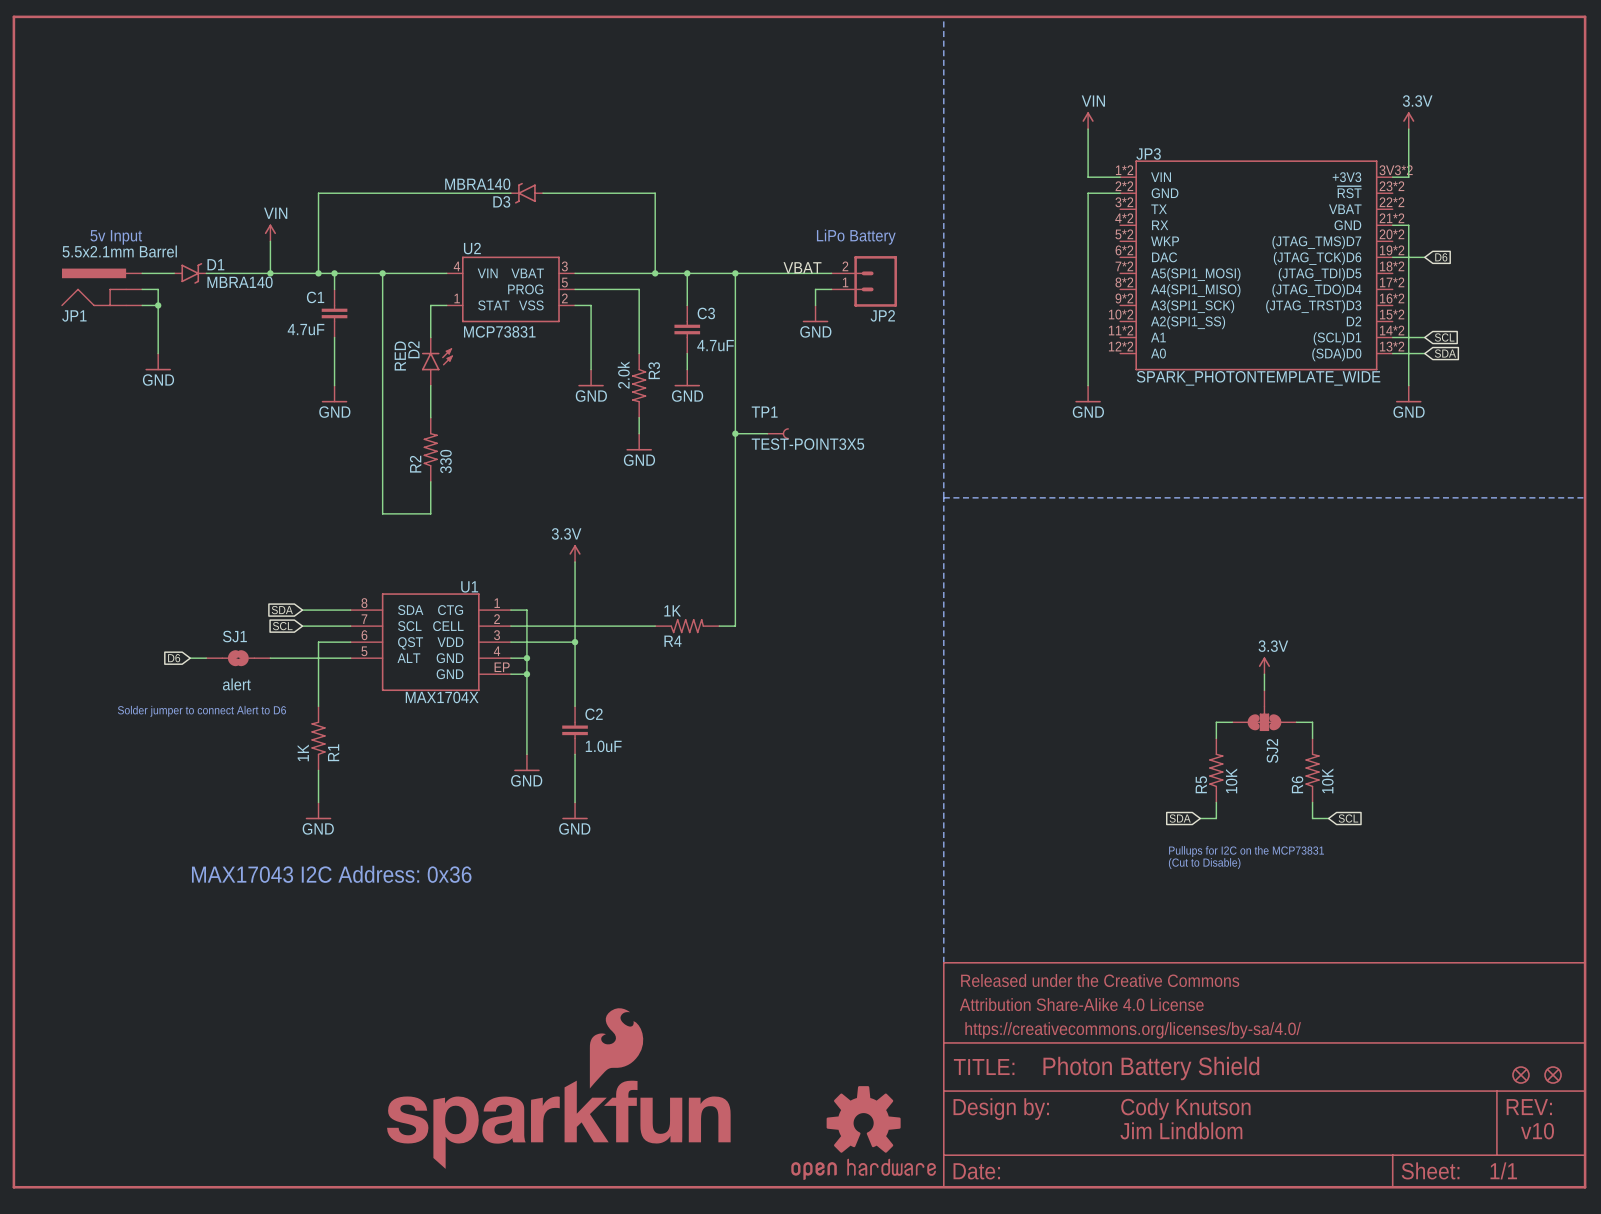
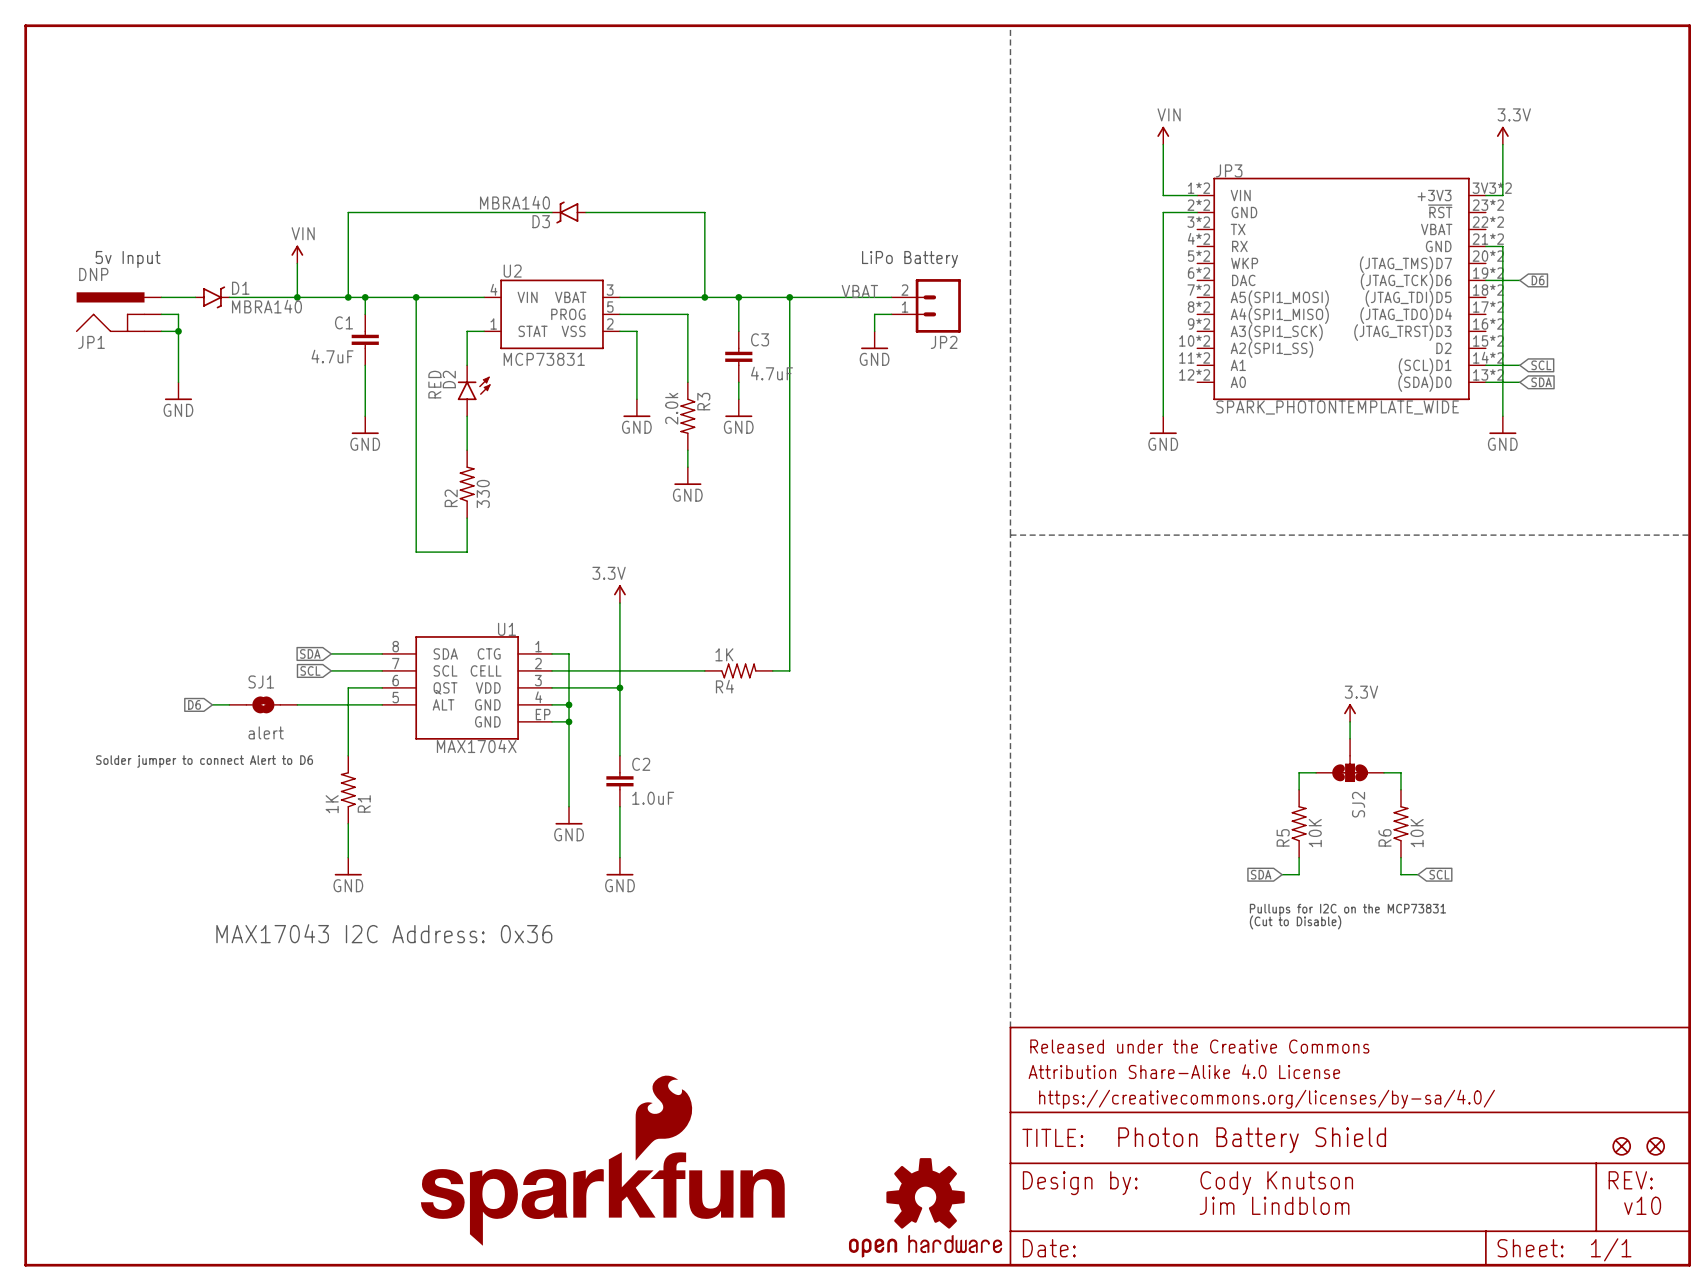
JP1 value: 5.5x2.1mm Barrel (119, 251) -> DNP (93, 274)
wire: (735, 433) (767, 433) -> none
junction: (735, 433) -> none
TP1: TEST-POINT3X5 (777, 433) -> none

